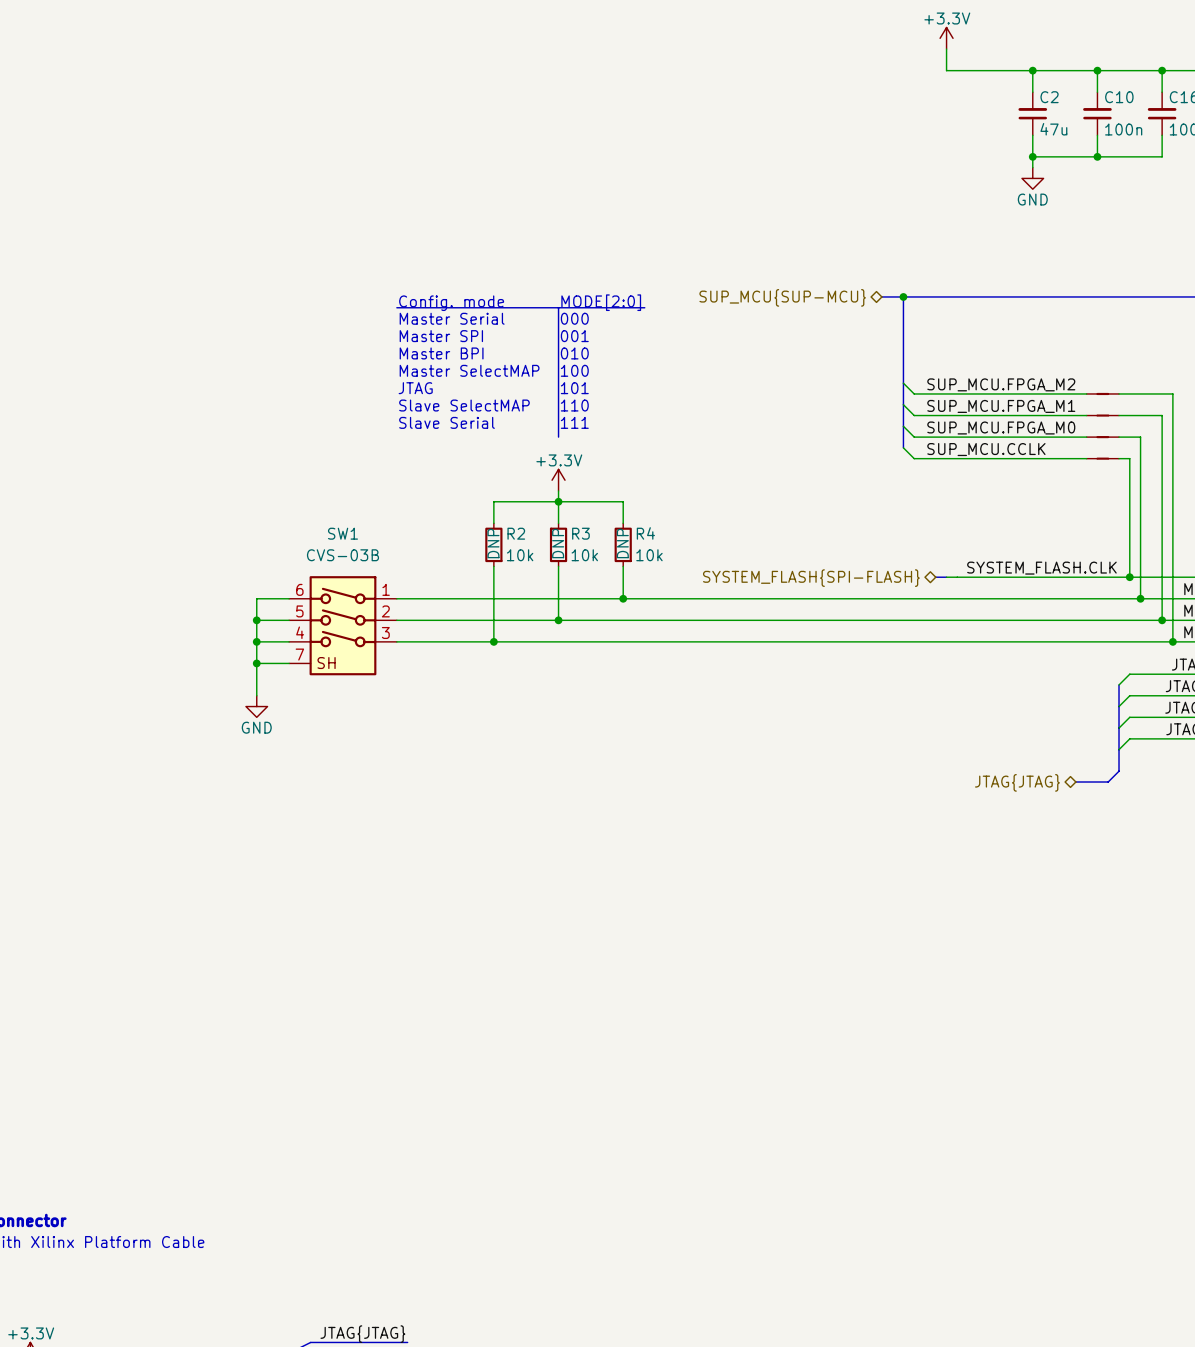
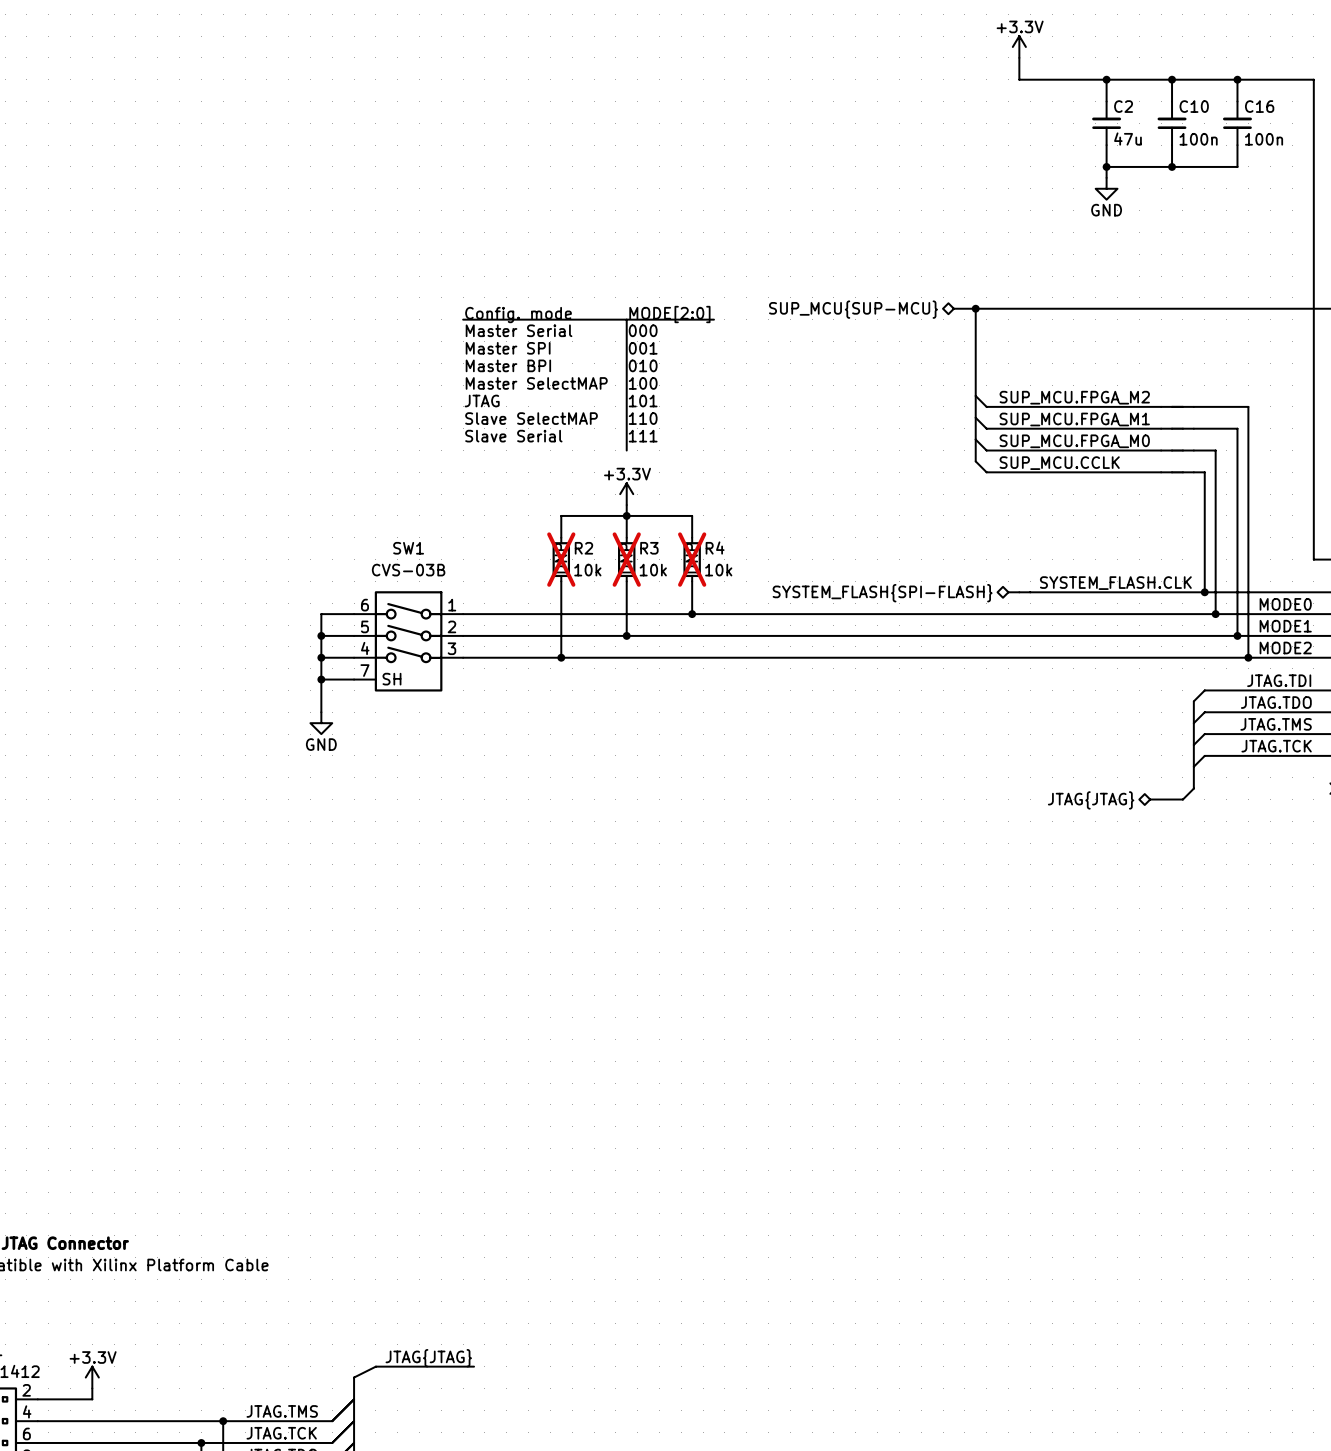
R2 do-not-place cross: none -> (561, 559)
R3 do-not-place cross: none -> (626, 559)
R4 do-not-place cross: none -> (692, 559)

